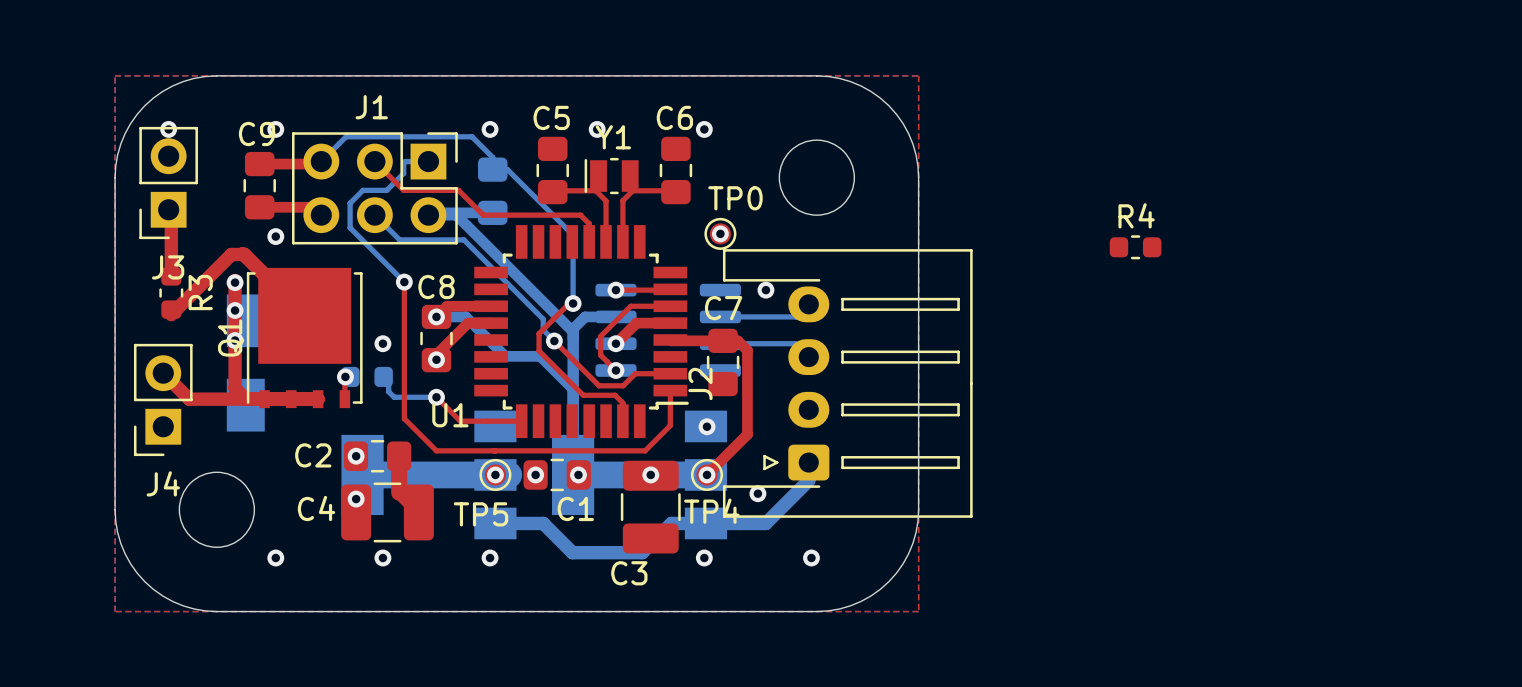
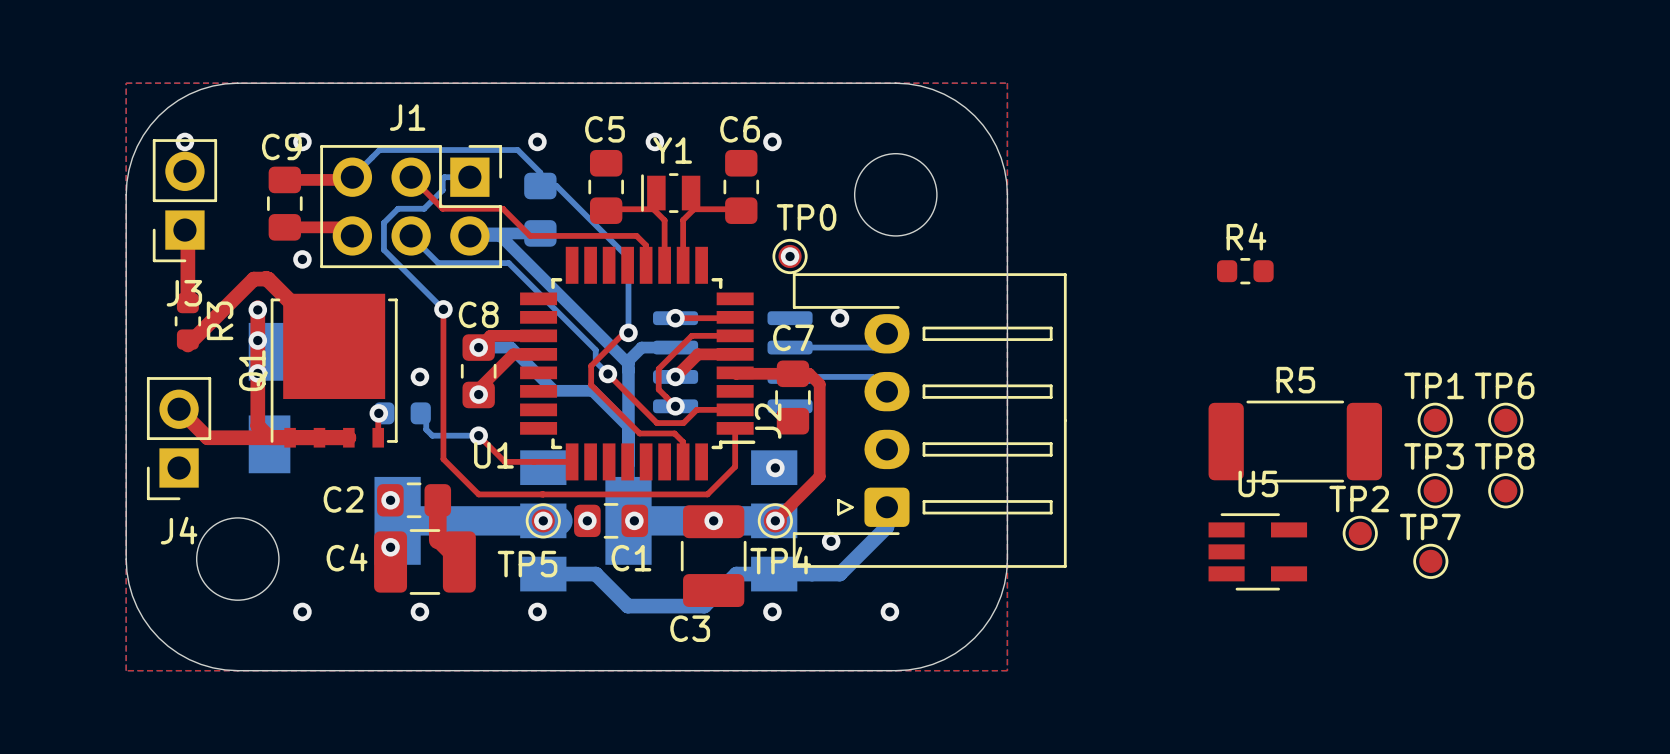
TP1: none -> (1435, 420)
TP6: none -> (1505, 420)
R5: none -> (1295, 441)
TP3: none -> (1435, 490)
TP8: none -> (1505, 490)
TP2: none -> (1360, 533)
U5: none -> (1257, 551)
TP7: none -> (1430, 561)

